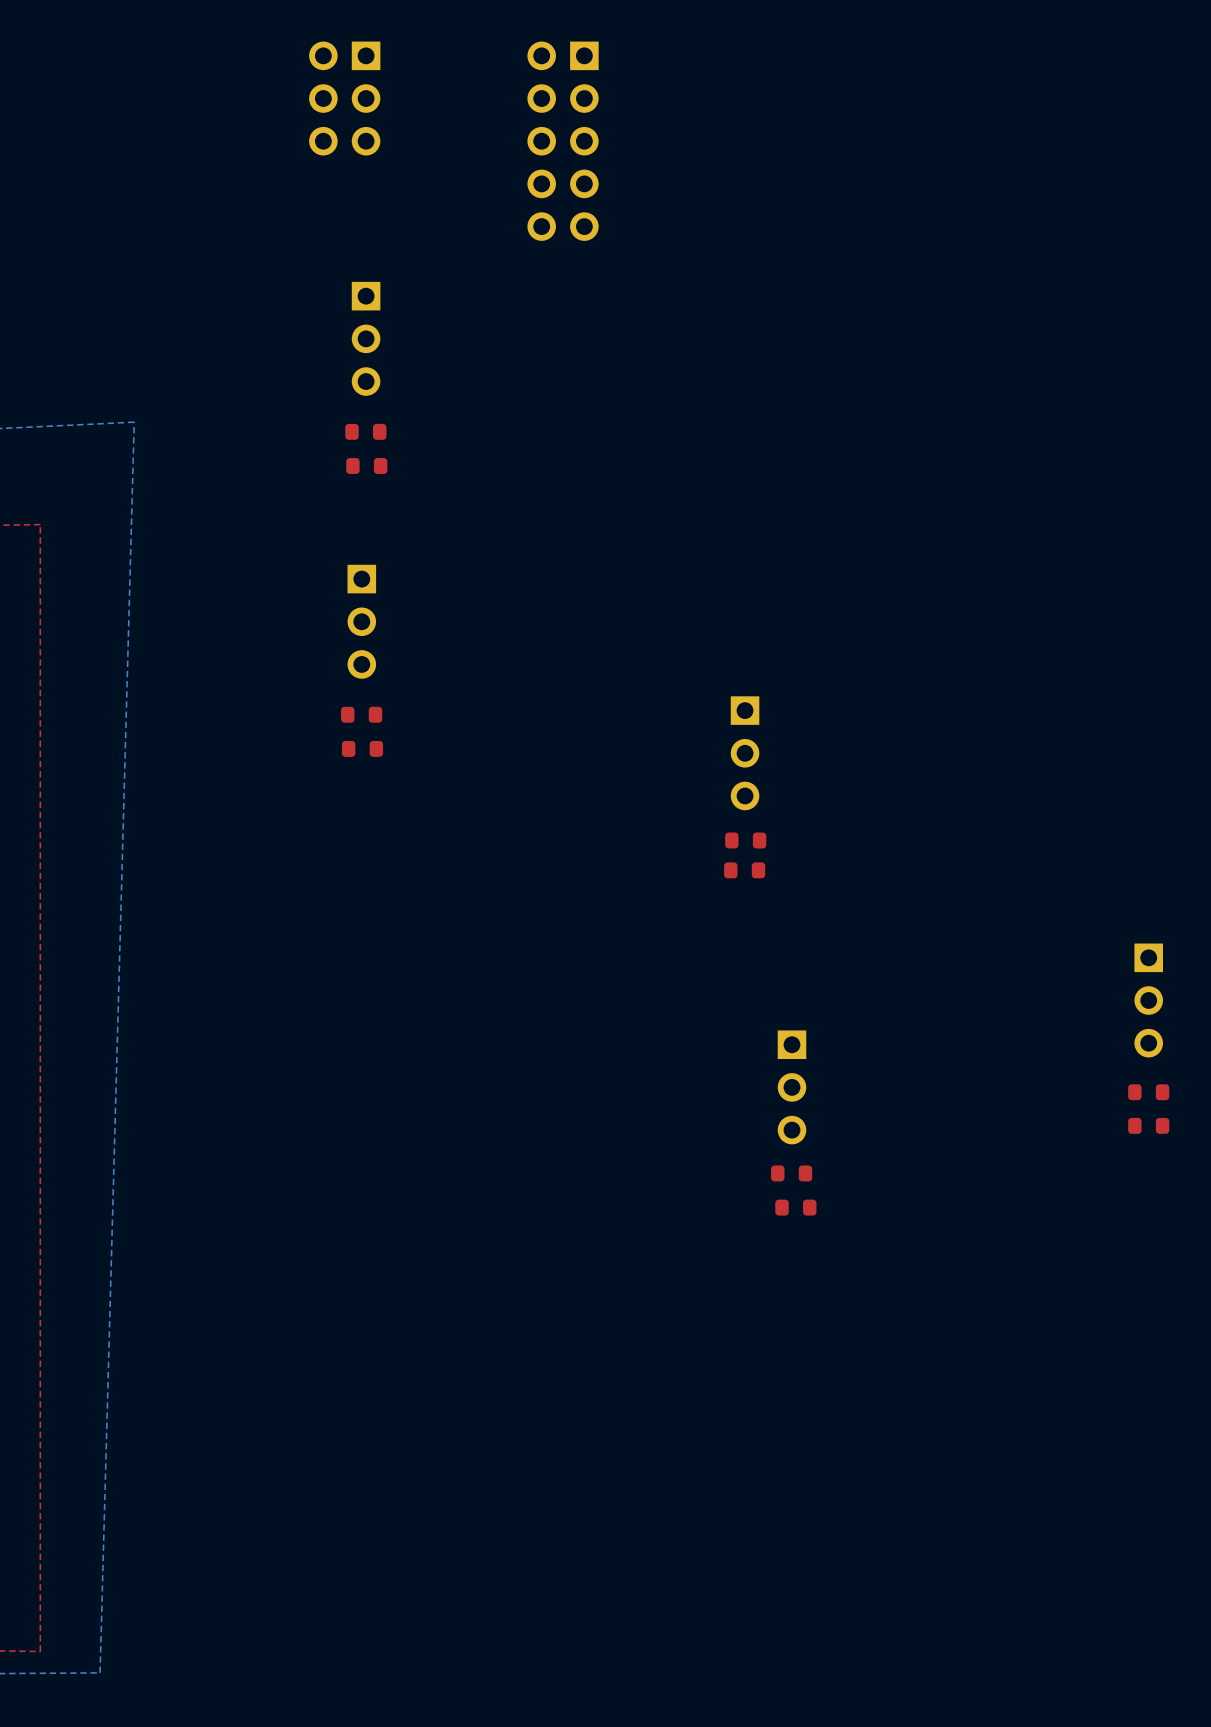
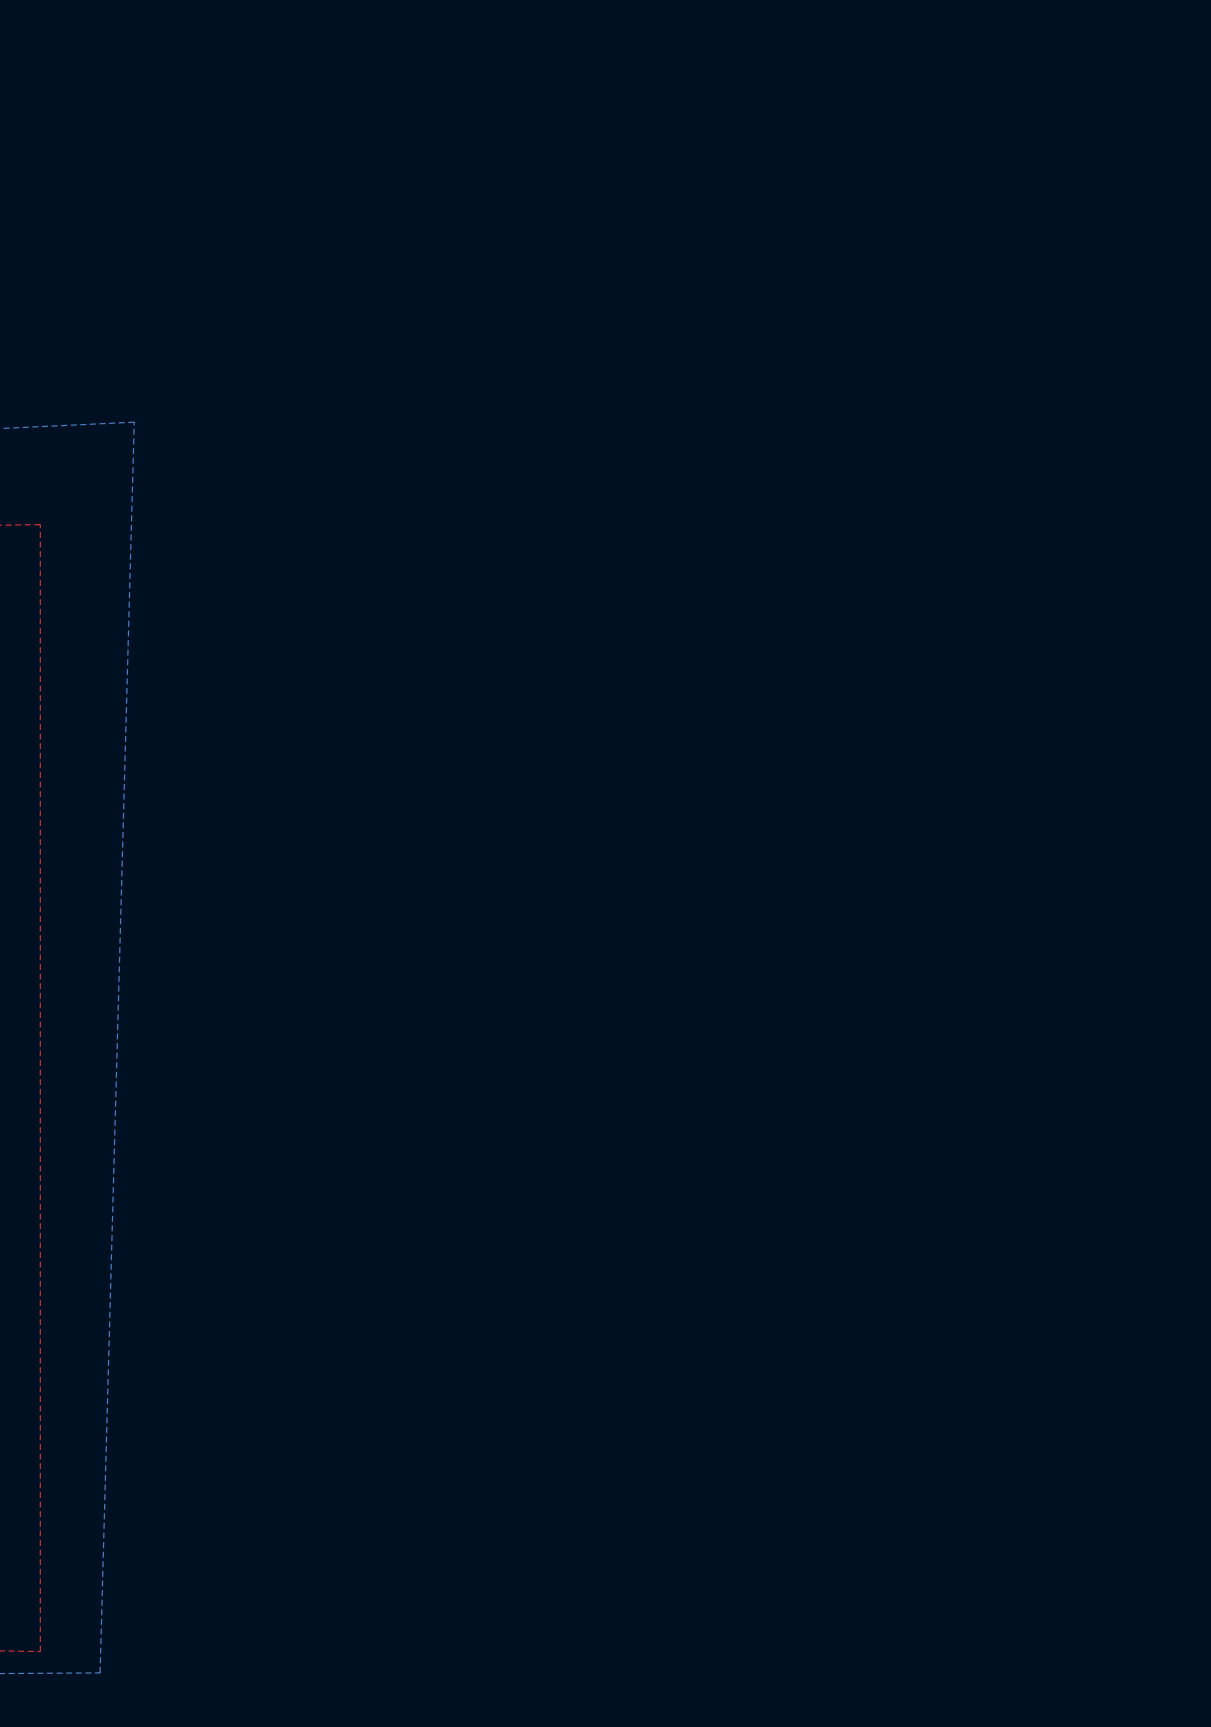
part: (344, 98) -> none
part: (563, 141) -> none
part: (366, 338) -> none
part: (365, 431) -> none
part: (366, 466) -> none
part: (361, 621) -> none
part: (361, 714) -> none
part: (362, 748) -> none
part: (745, 753) -> none
part: (745, 840) -> none
part: (744, 870) -> none
part: (1148, 1000) -> none
part: (792, 1087) -> none
part: (1148, 1092) -> none
part: (1148, 1125) -> none
part: (791, 1173) -> none
part: (795, 1207) -> none

